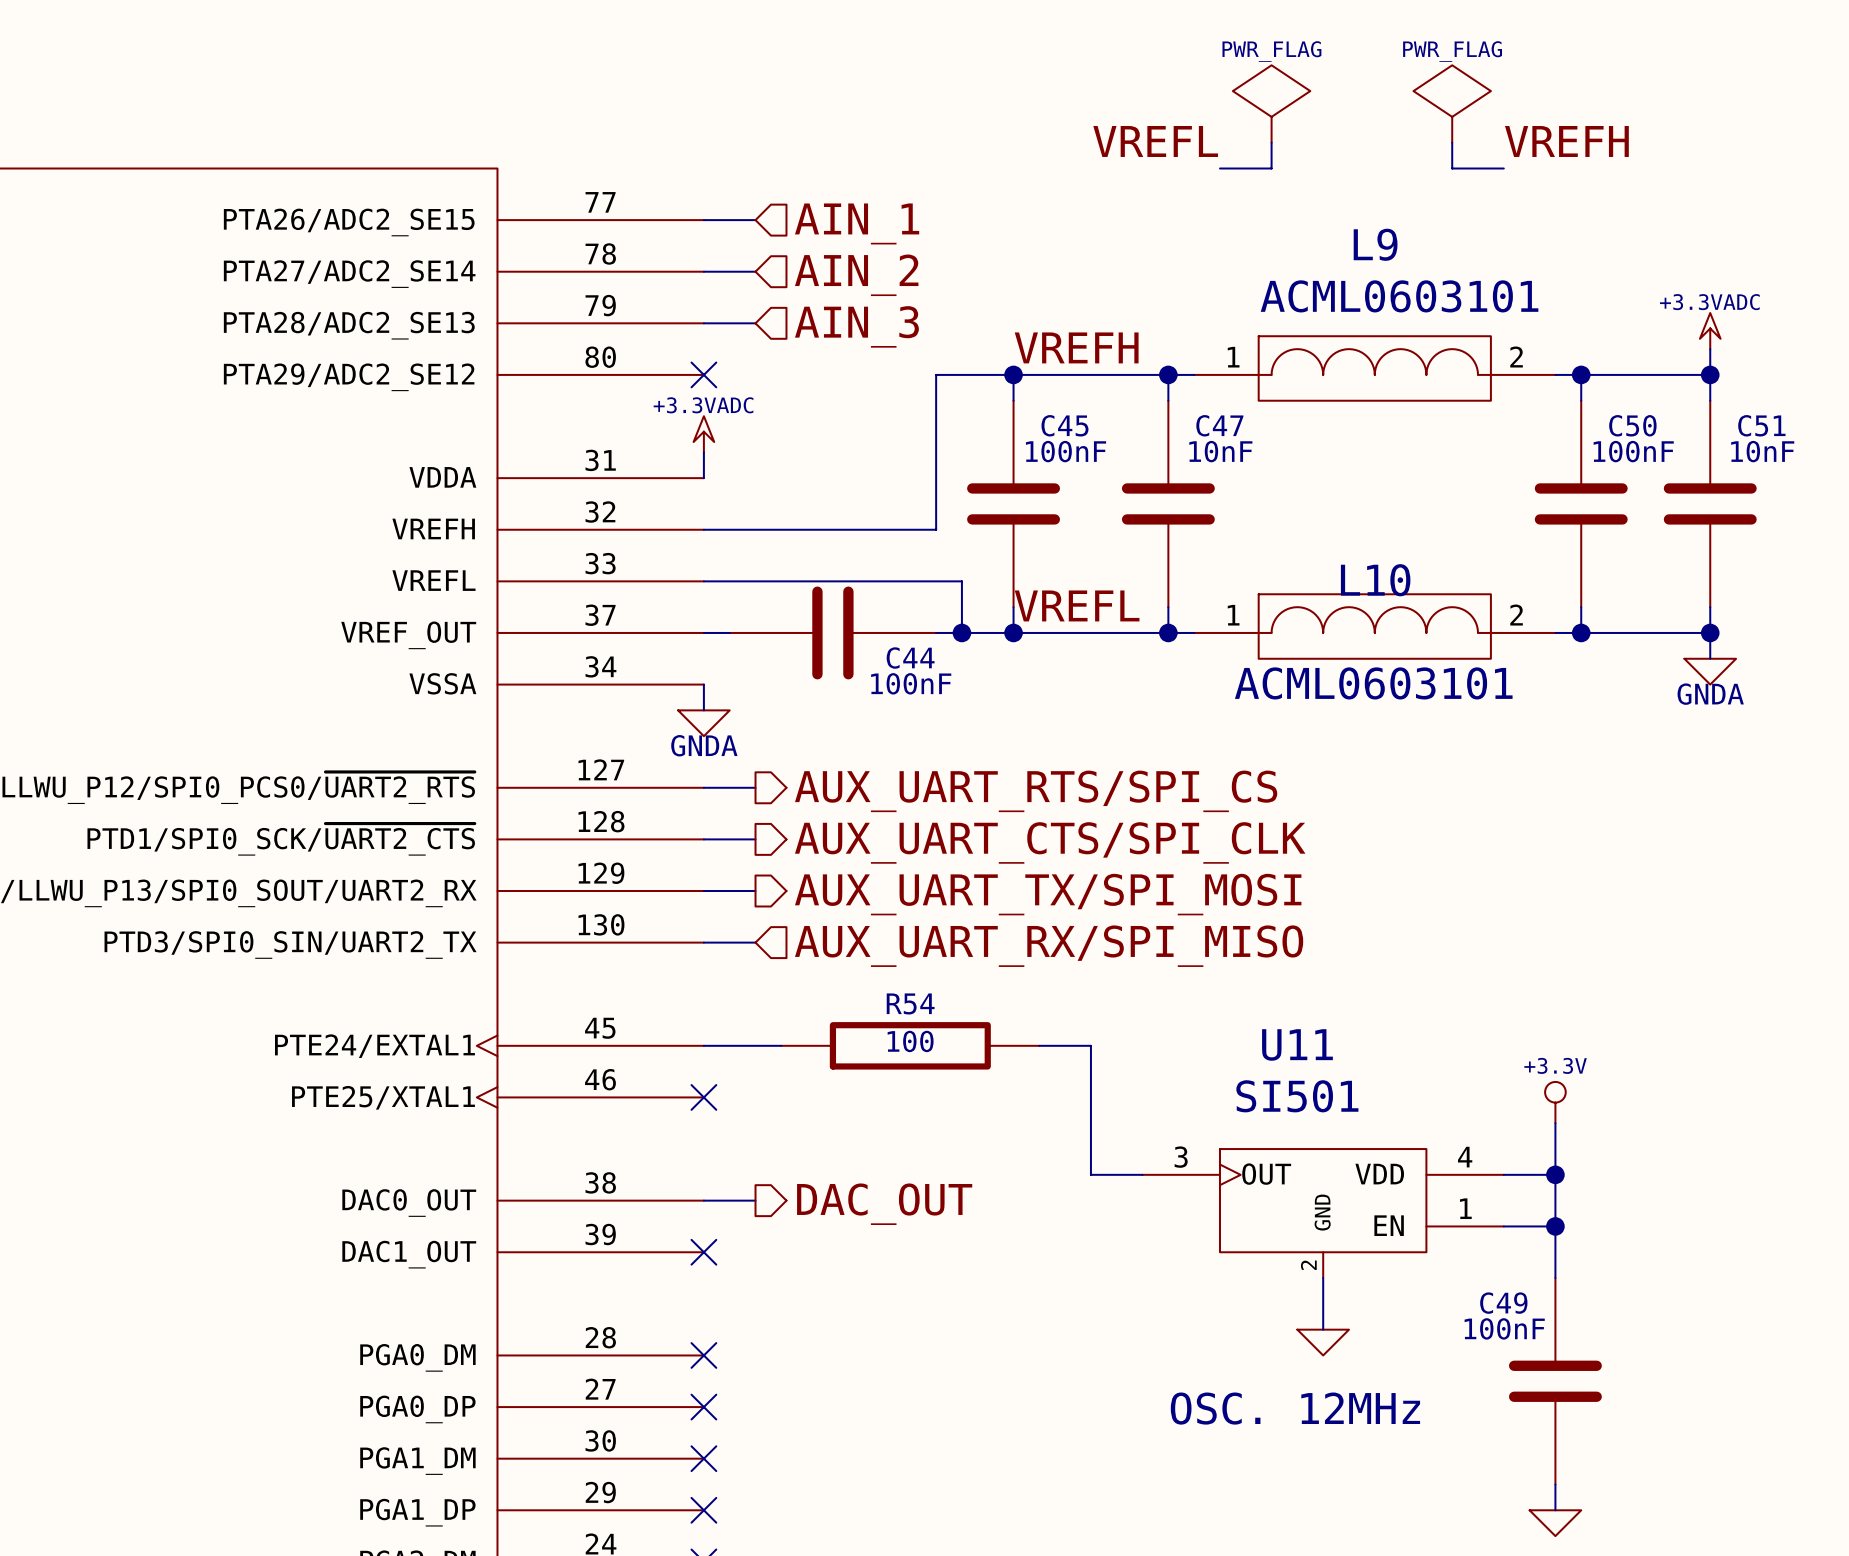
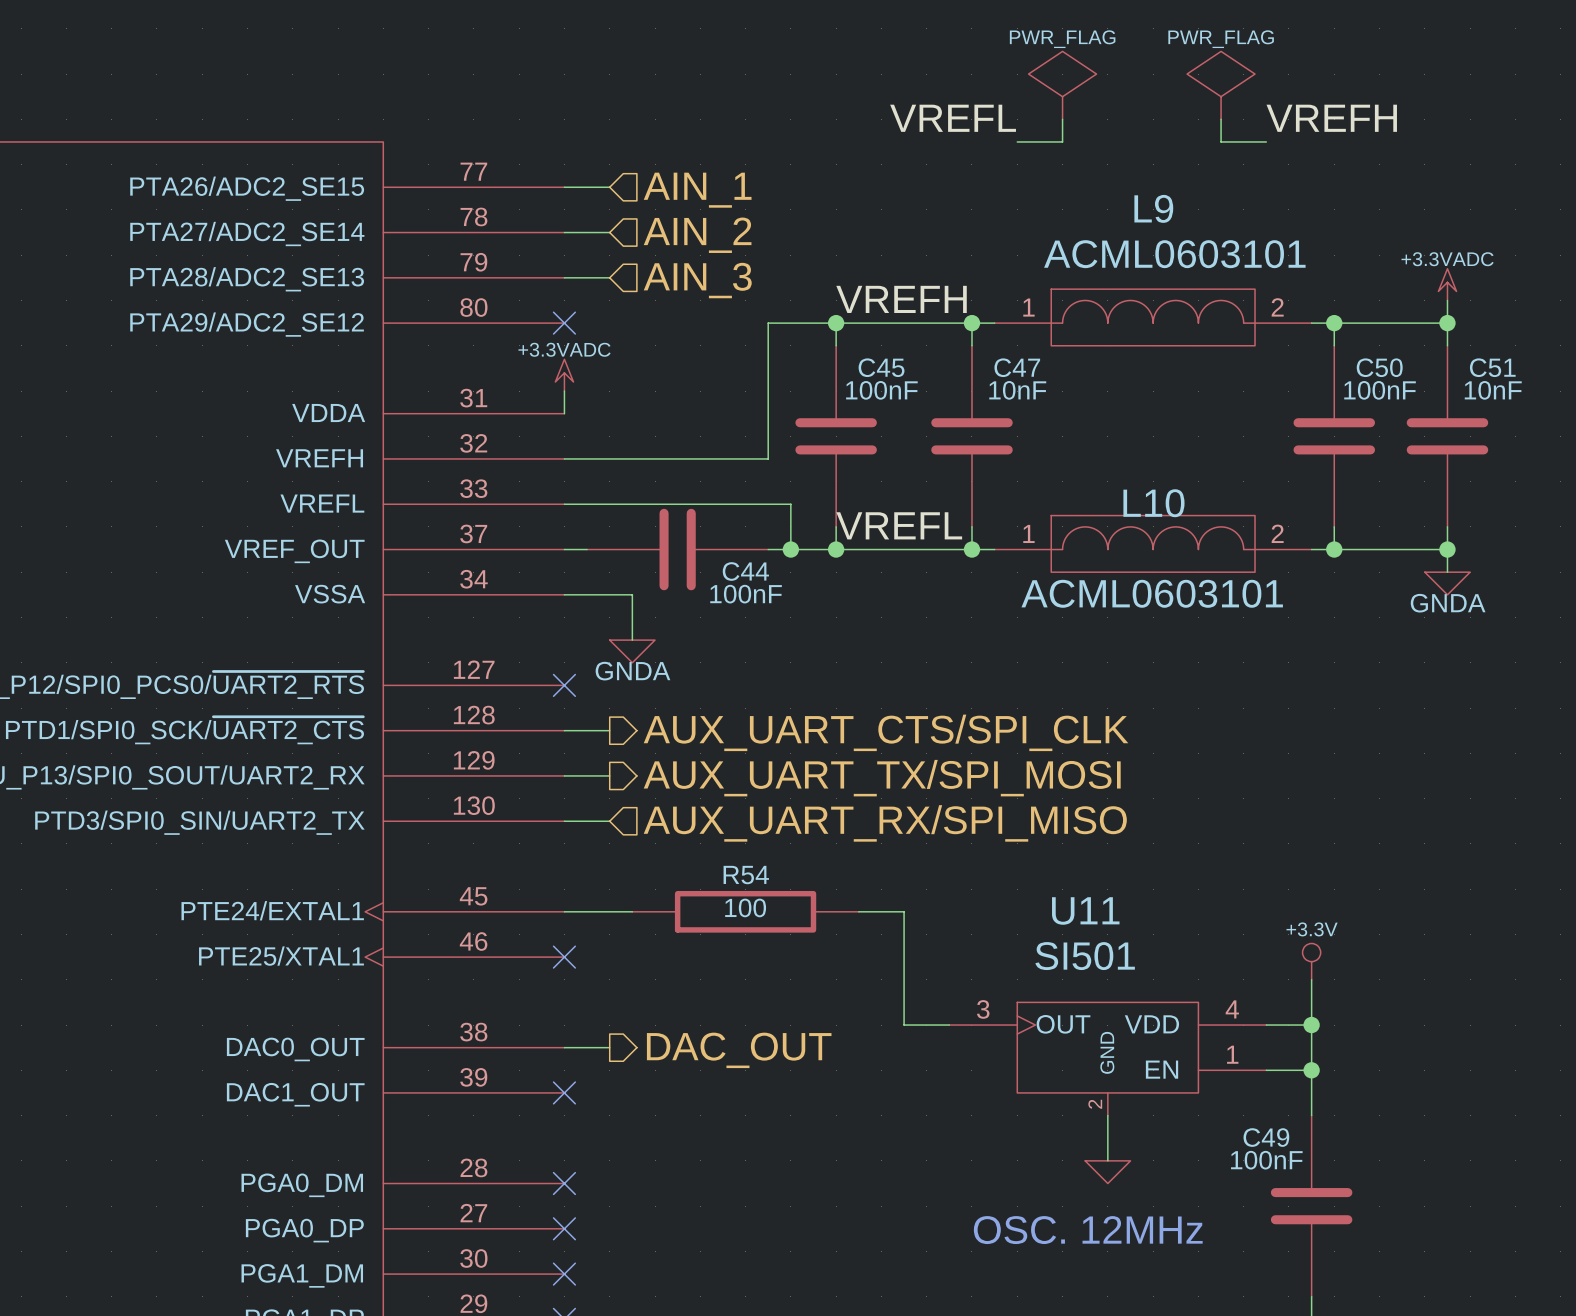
wire: (703, 684) (703, 710) -> (564, 594) (632, 594) (632, 640)
power symbol position: GNDA (703, 723) -> GNDA (632, 651)
wire: (703, 787) (755, 787) -> none
no-connect mark: none -> (564, 685)
hierarchical label: AUX_UART_RTS/SPI_CS (1036, 791) -> none

